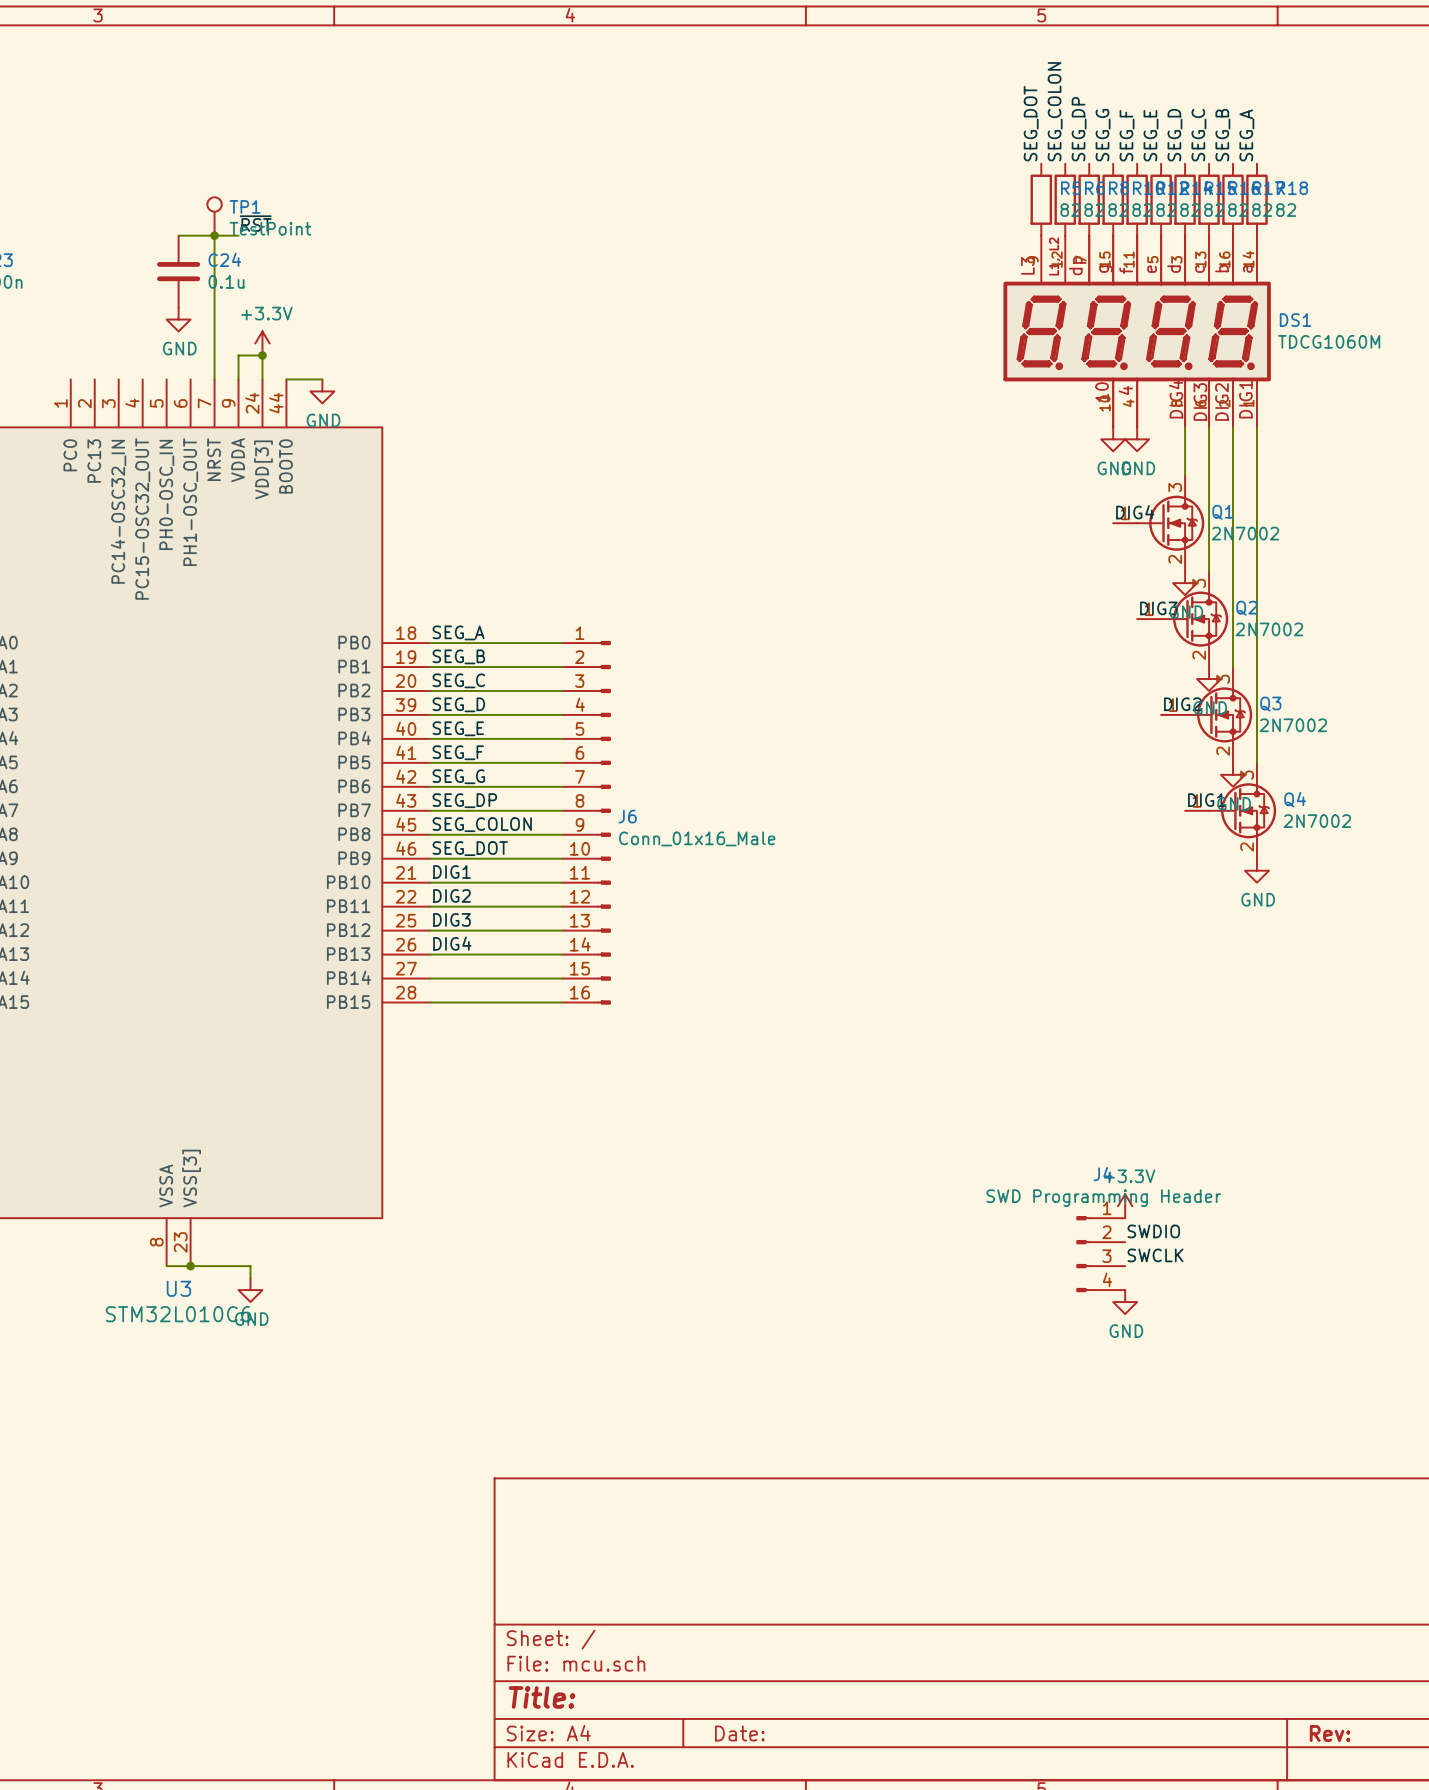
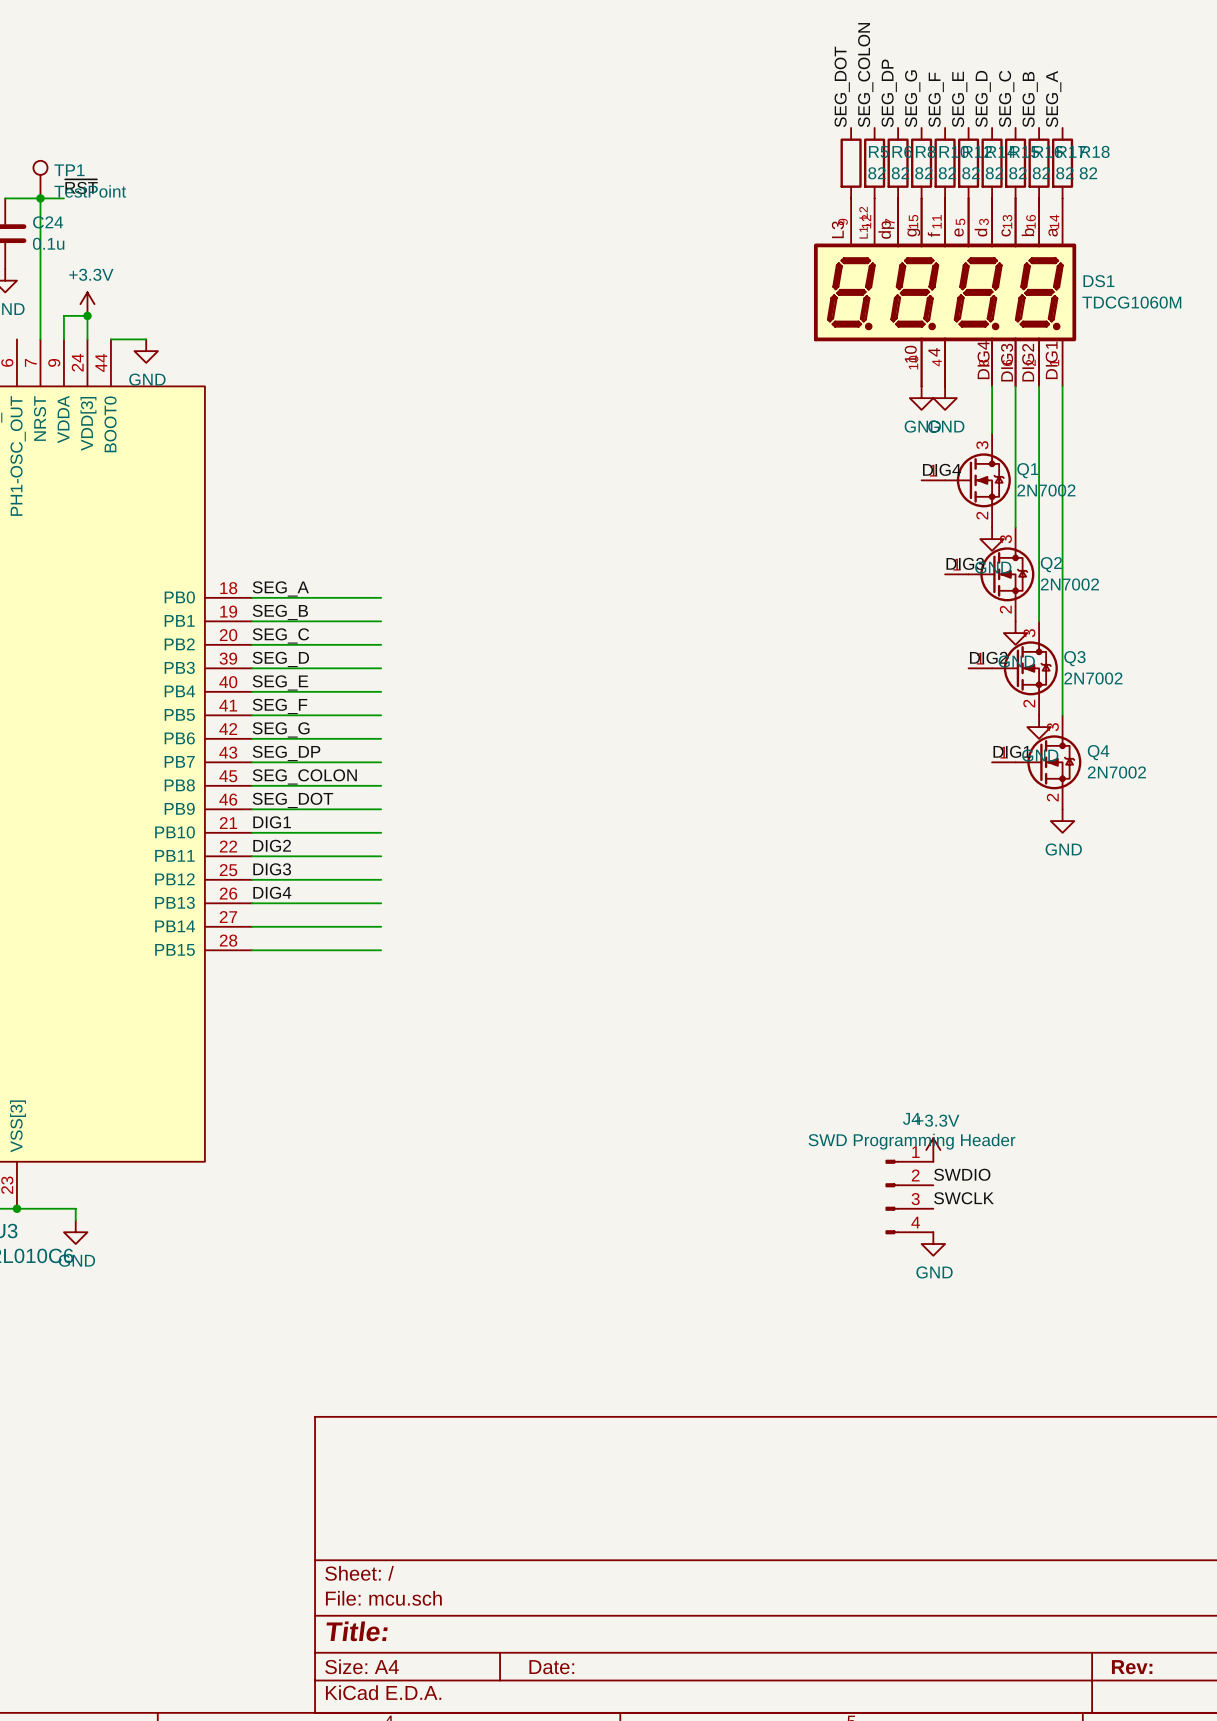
J6: Conn_01x16_Male (586, 822) -> none

